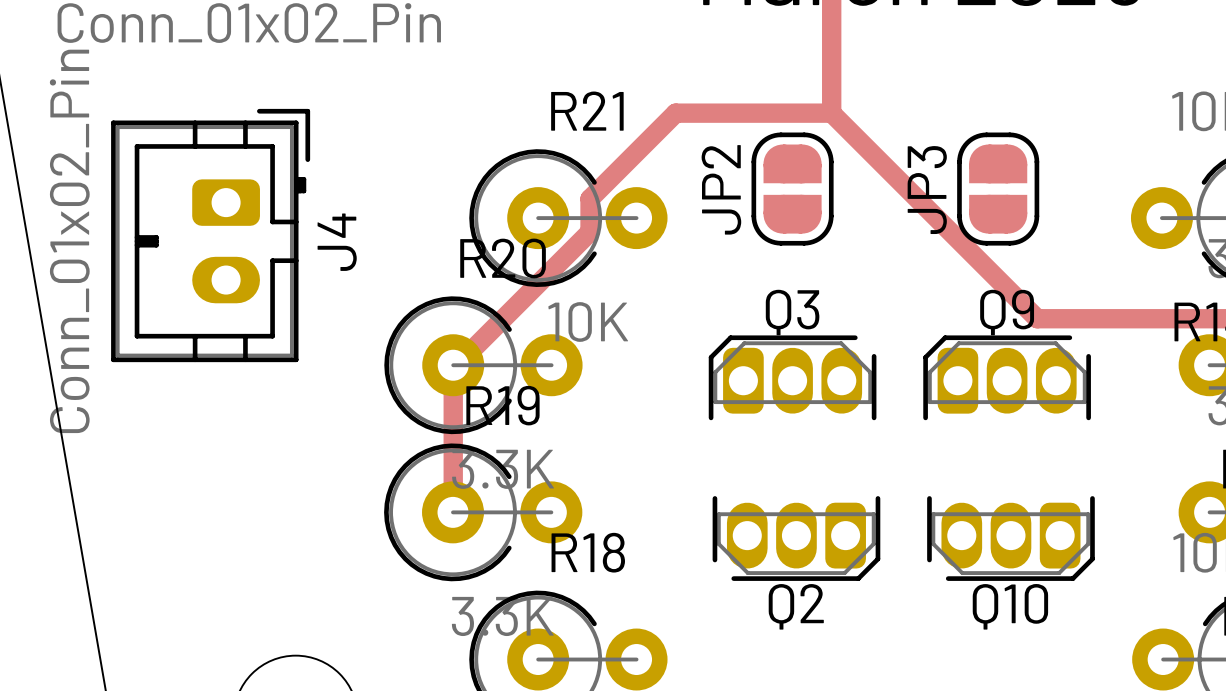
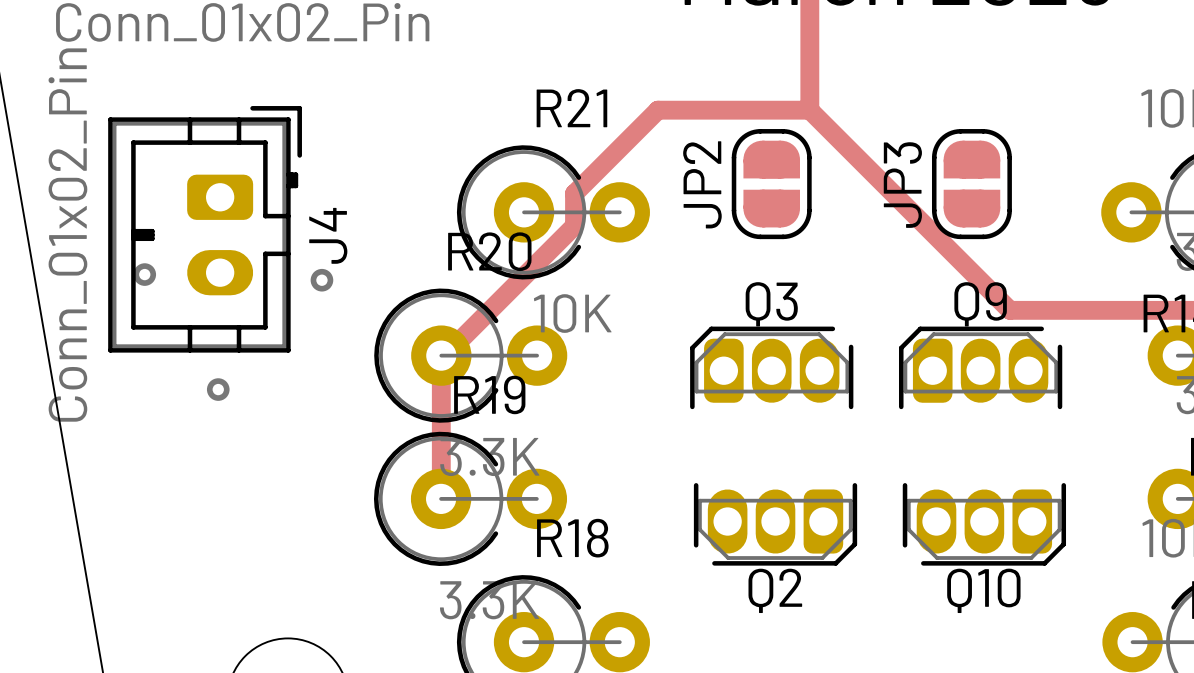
via: none -> (144, 274)
via: none -> (321, 280)
via: none -> (218, 389)

